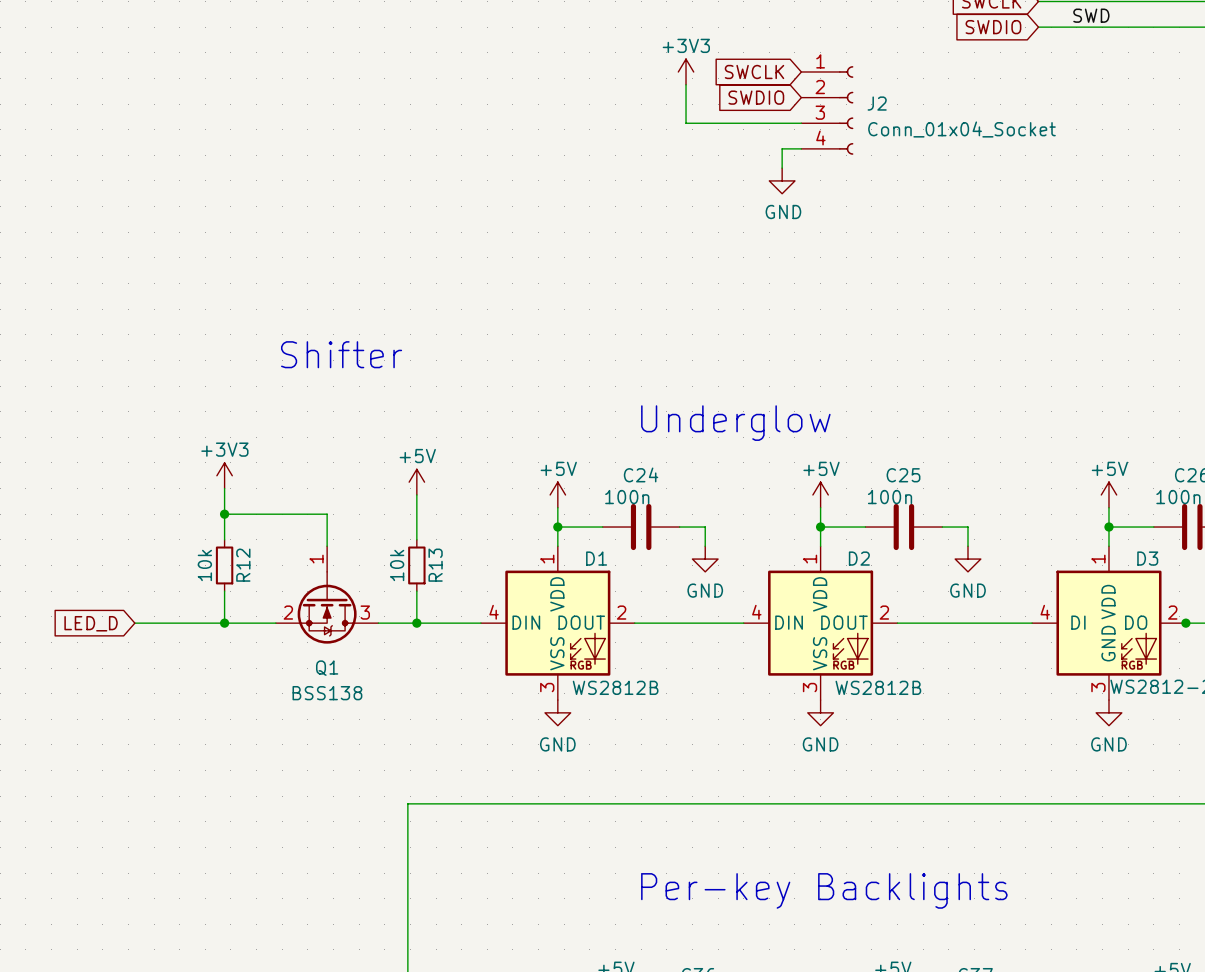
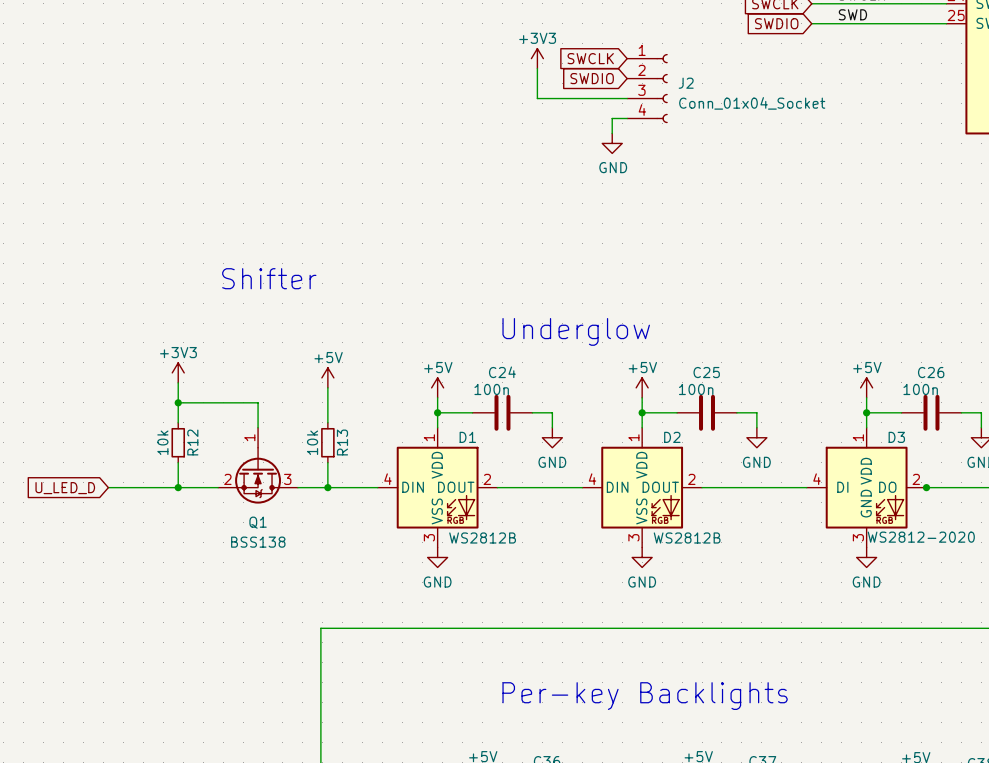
global label: LED_D (91, 623) -> U_LED_D (65, 488)

